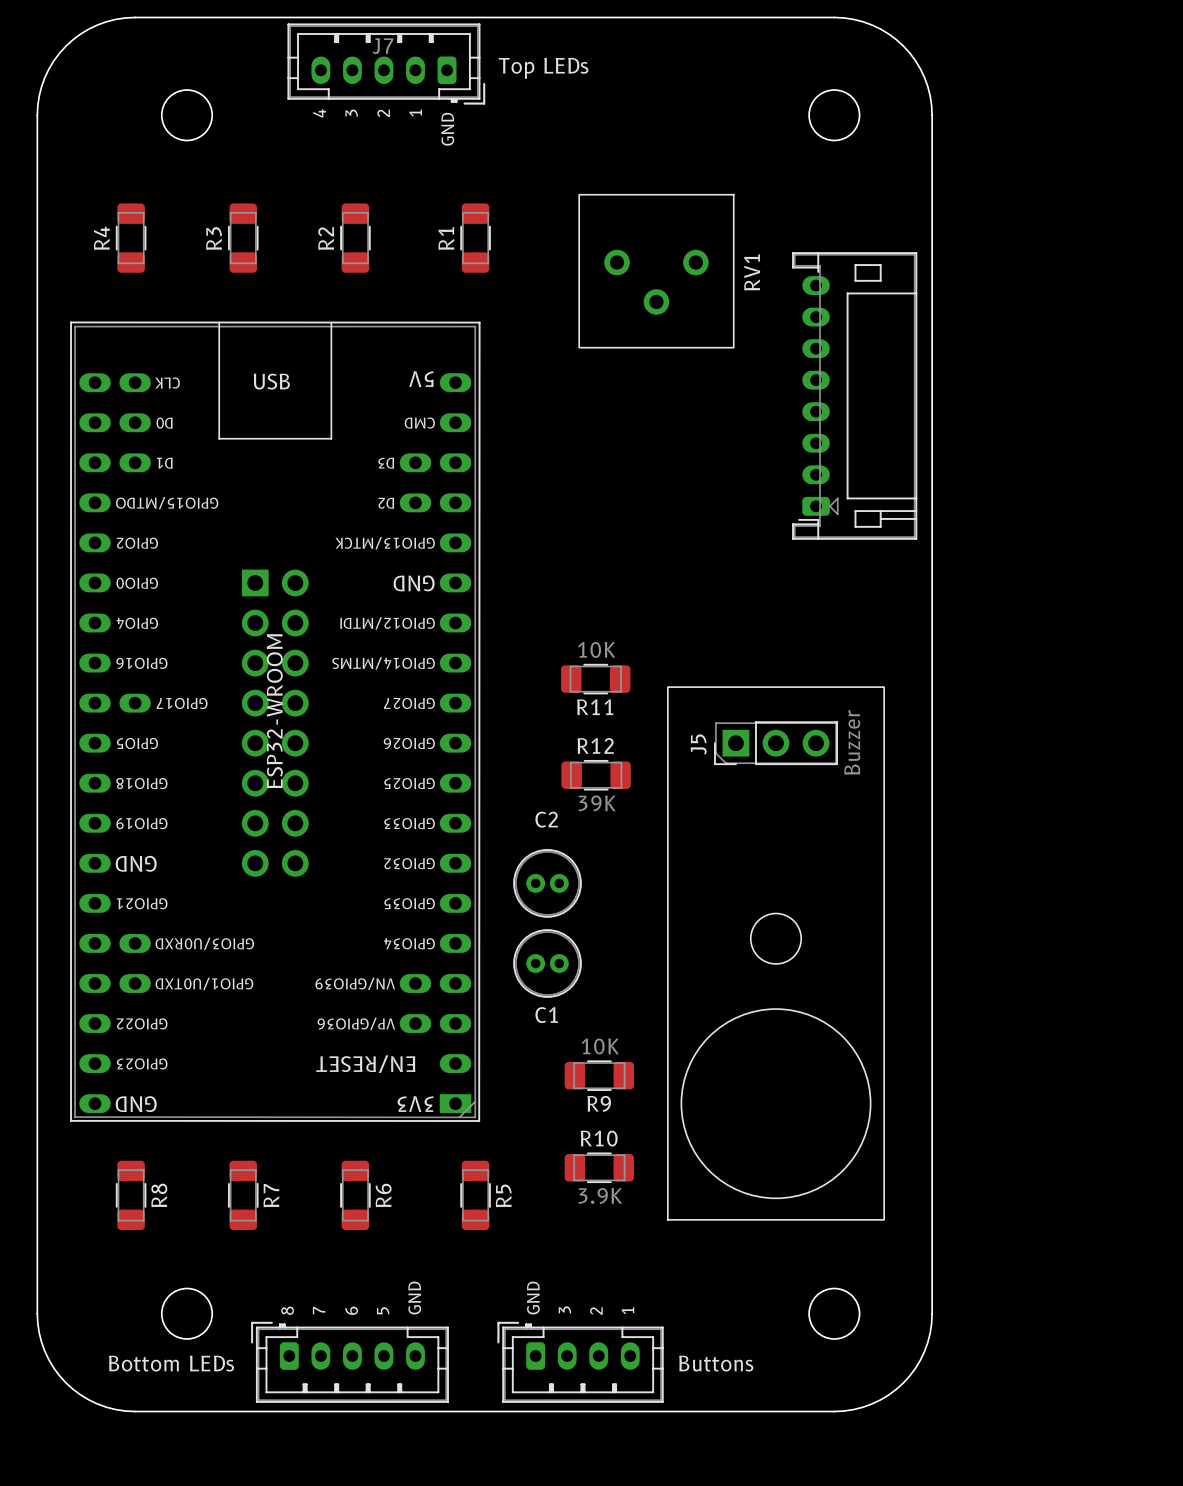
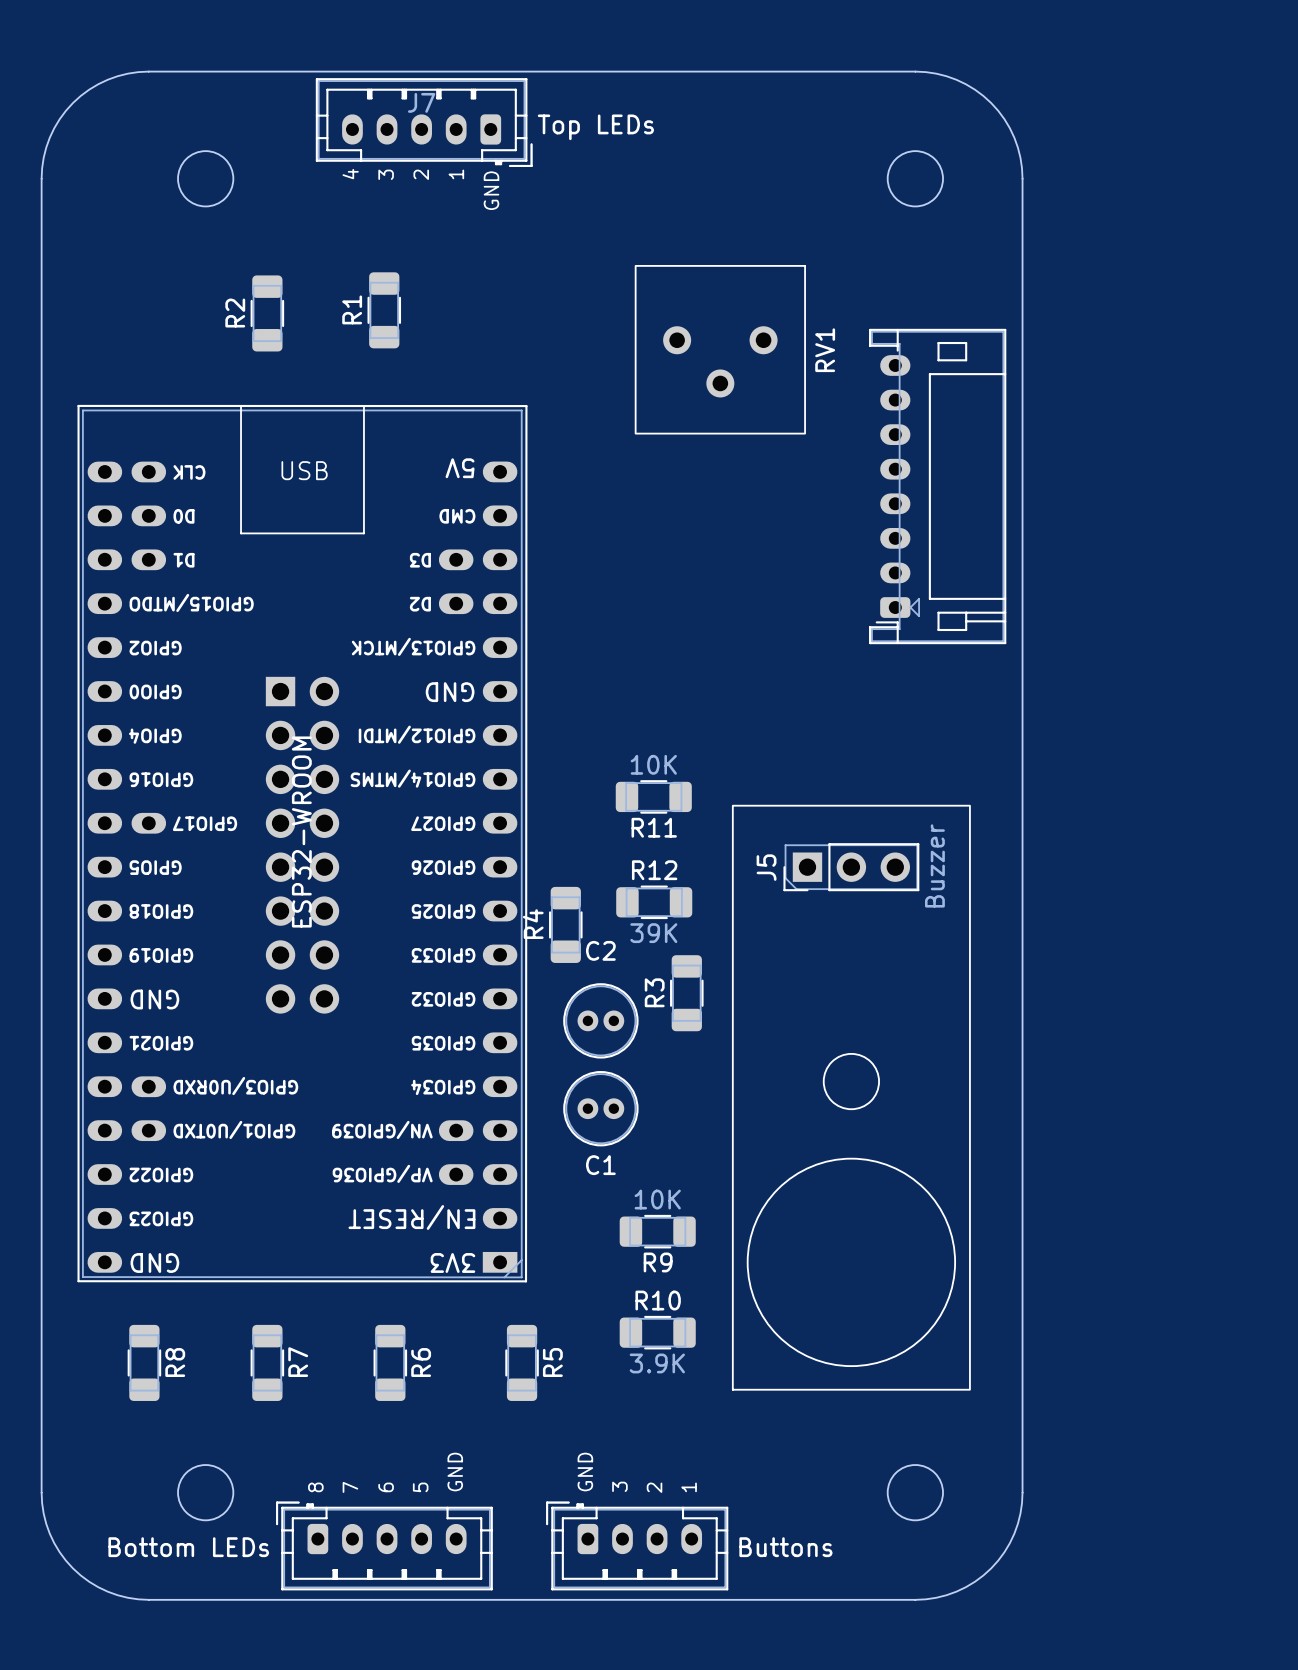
R4 position: (131, 238) -> (565, 924)
R3 name: R3 (214, 238) -> R2 (235, 313)
R2: (355, 238) -> none
R1 position: (475, 238) -> (384, 310)
R3: none -> (686, 993)

